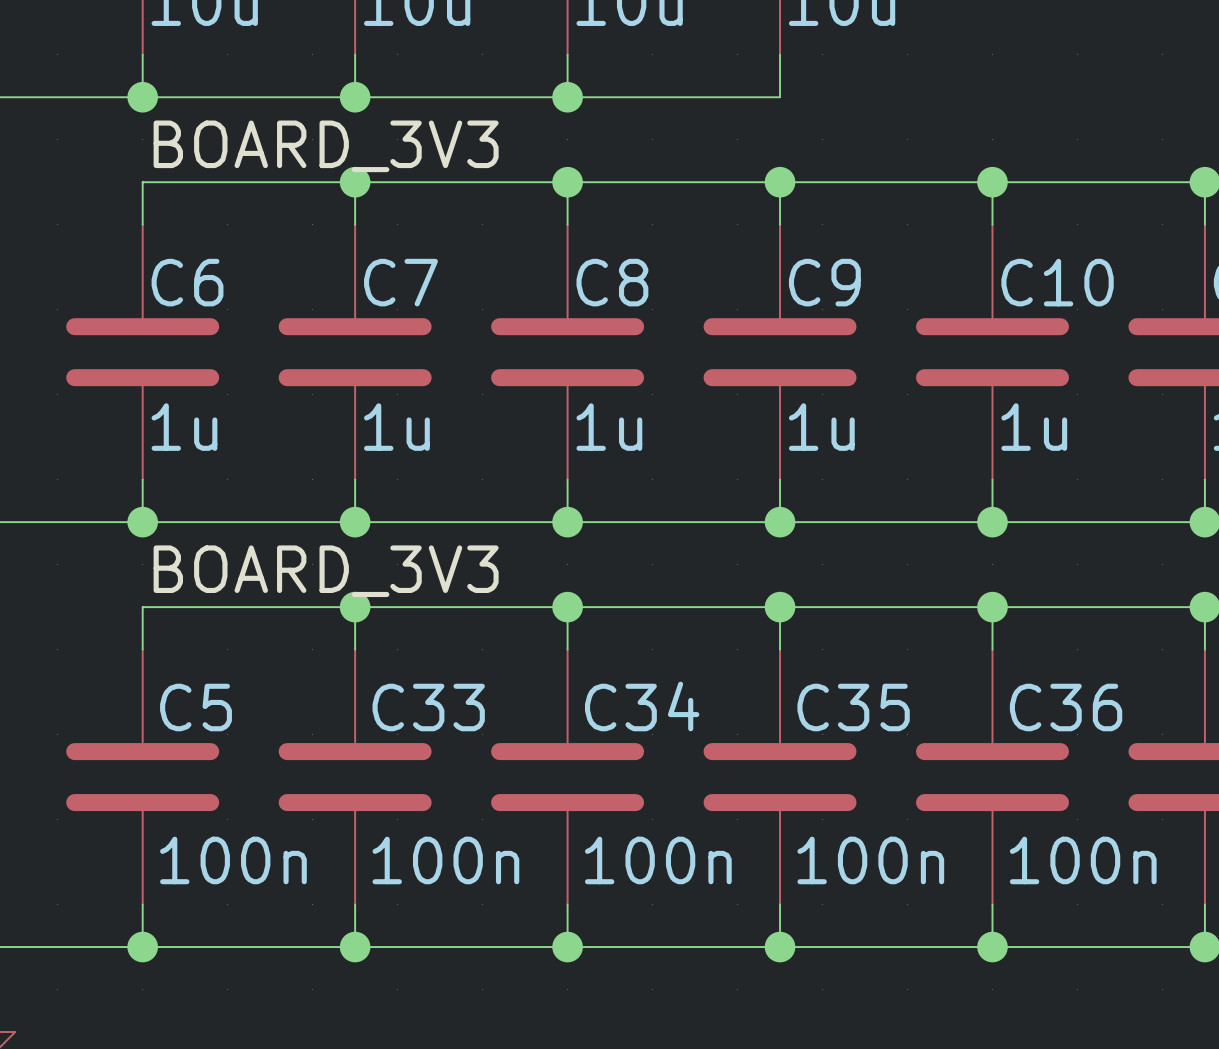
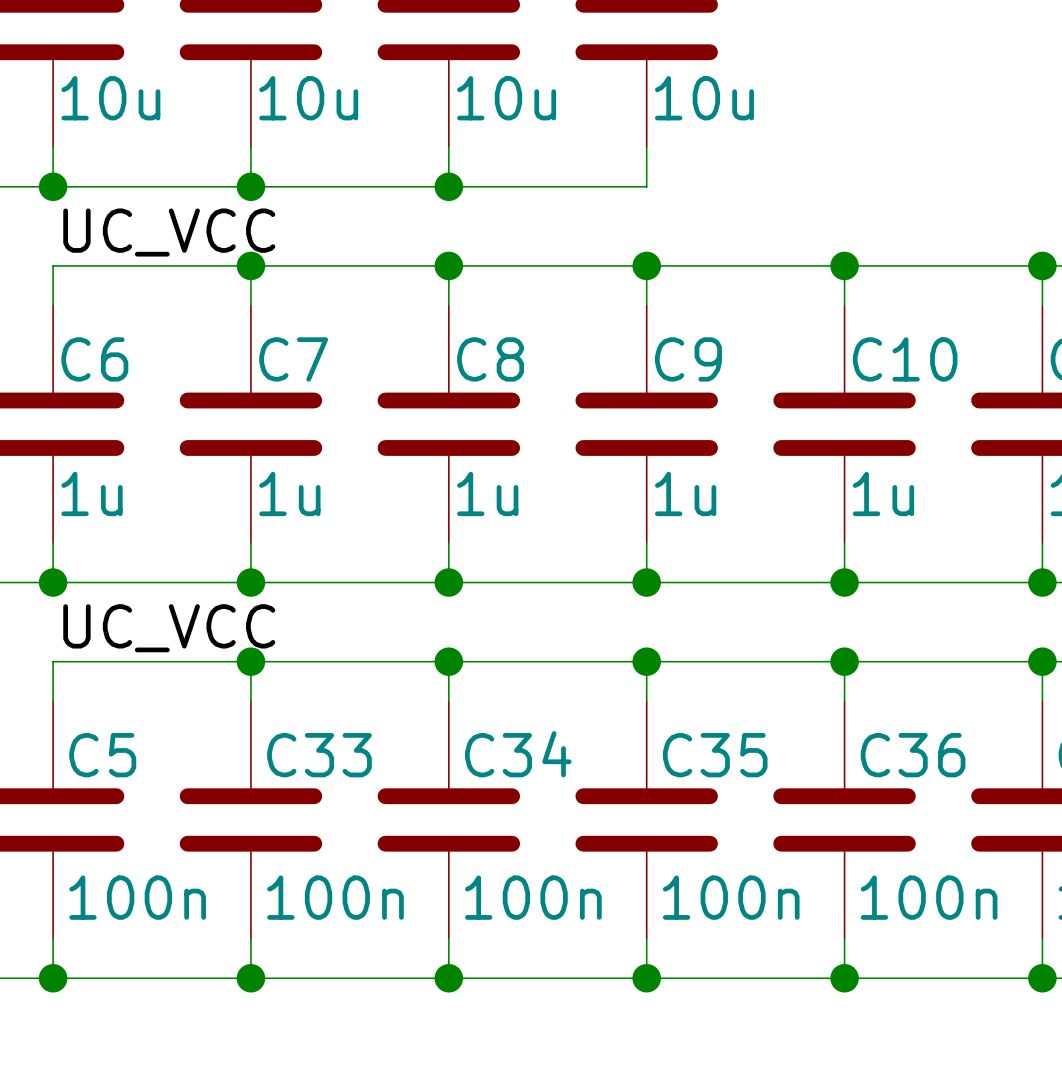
label: BOARD_3V3 (326, 146) -> UC_VCC (169, 232)
label: BOARD_3V3 (326, 571) -> UC_VCC (169, 628)

